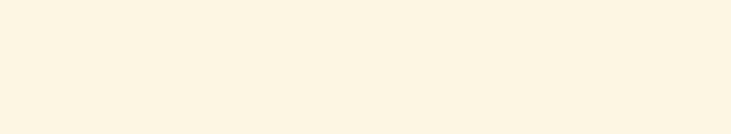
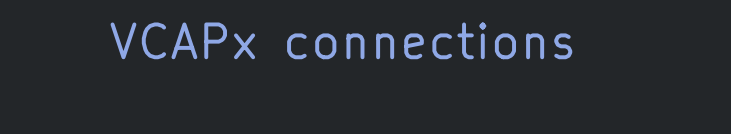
text: none -> VCAPx connections (341, 40)

